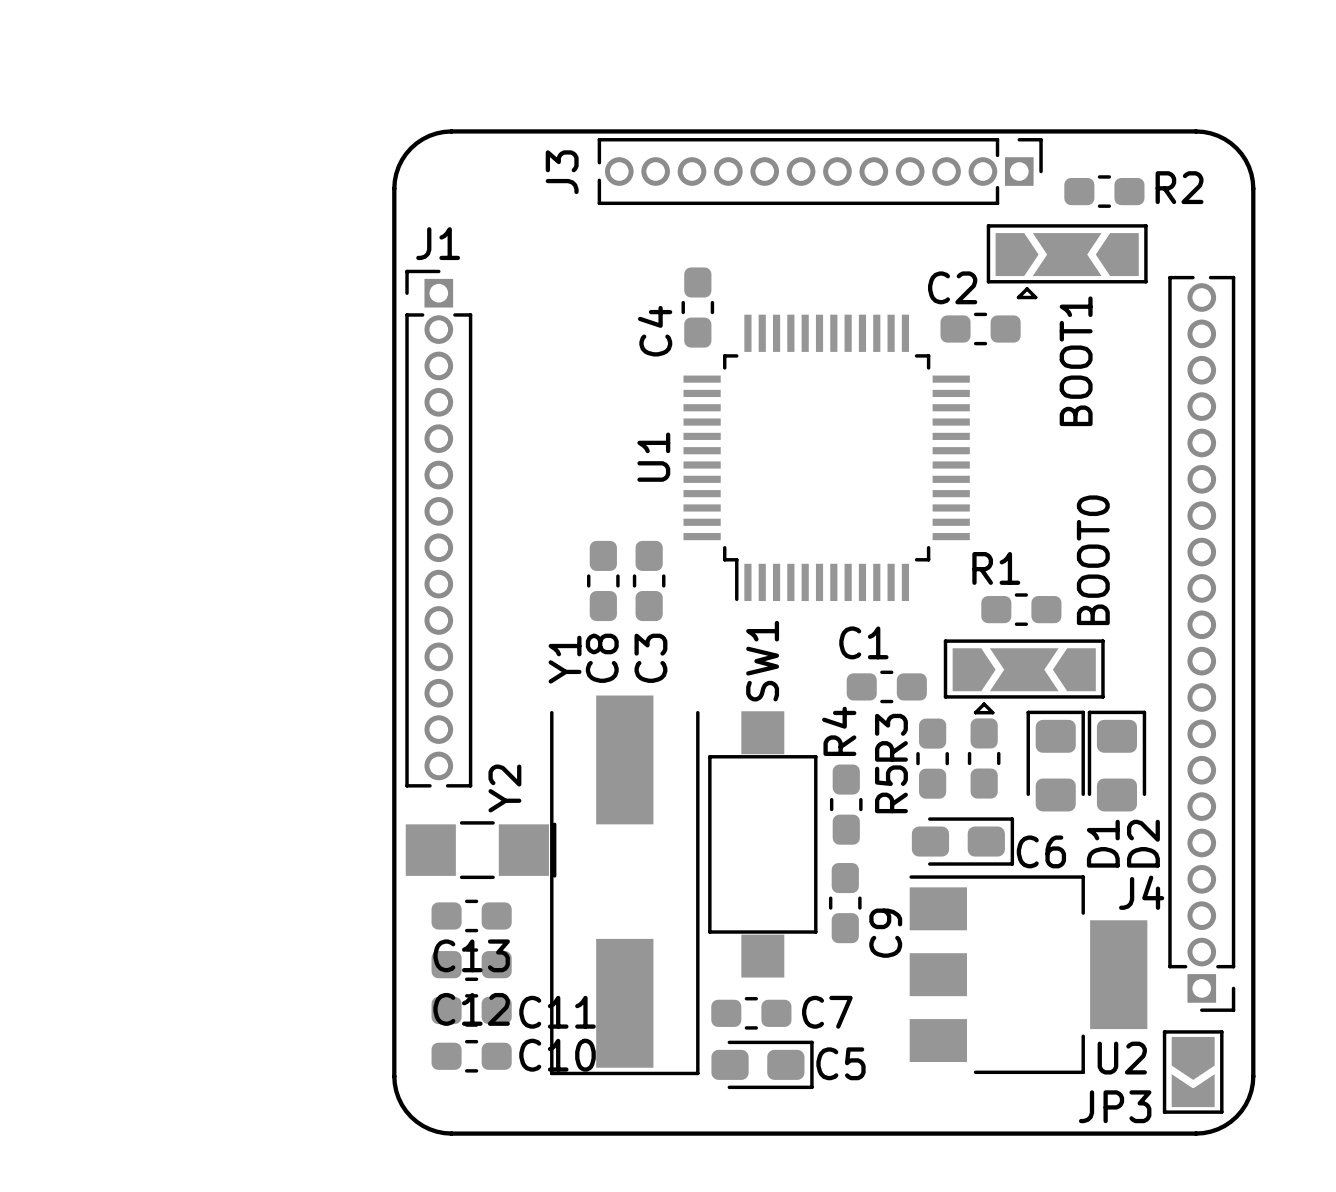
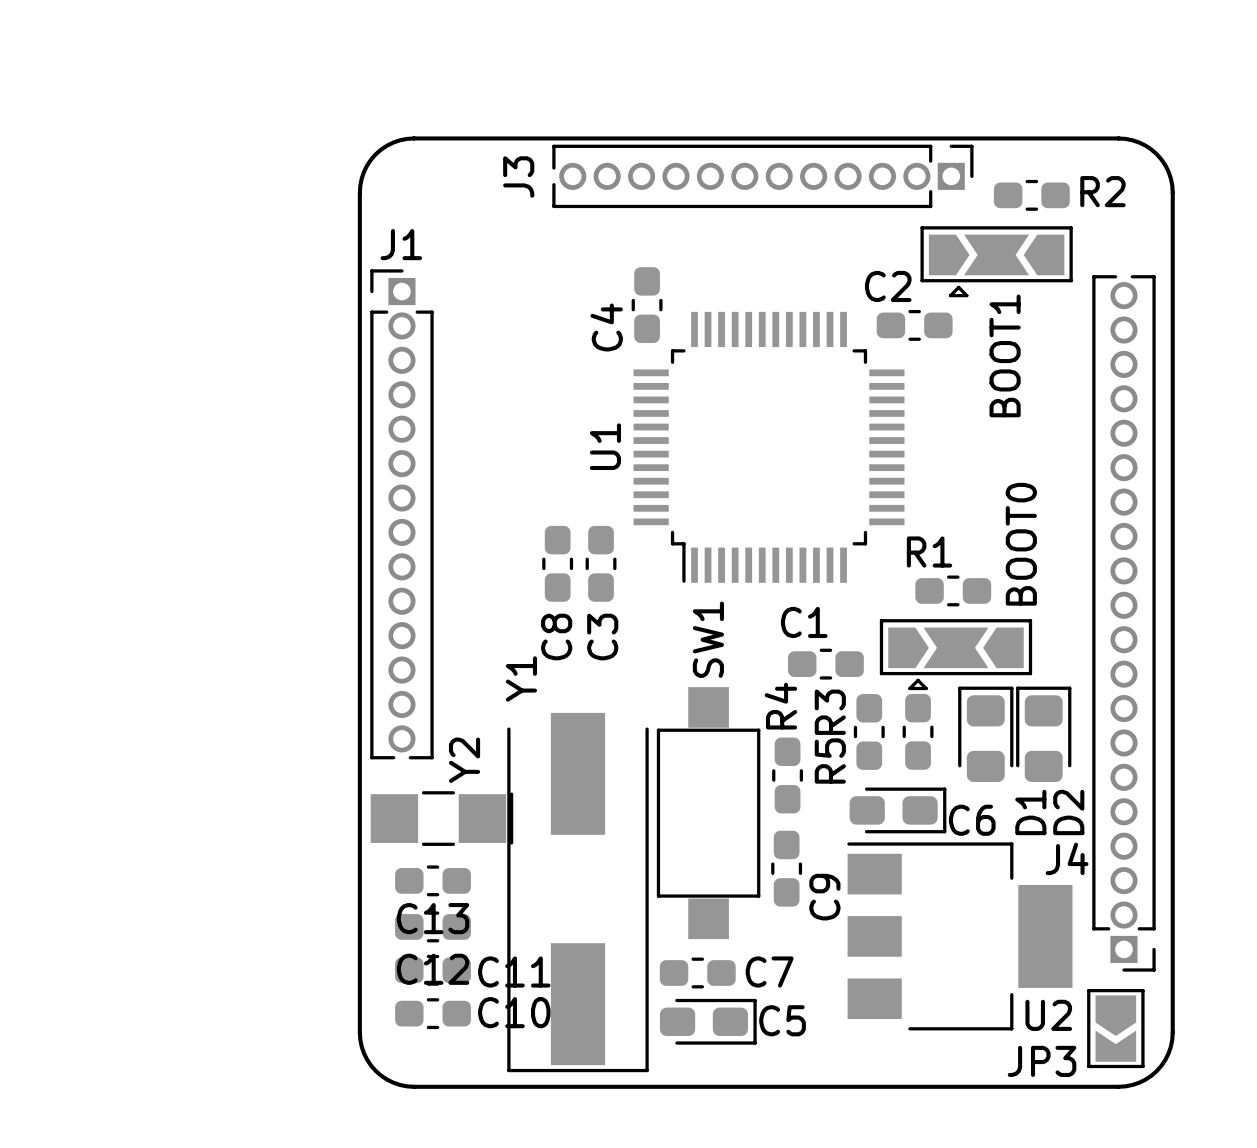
Y1 position: (624, 885) -> (577, 892)

